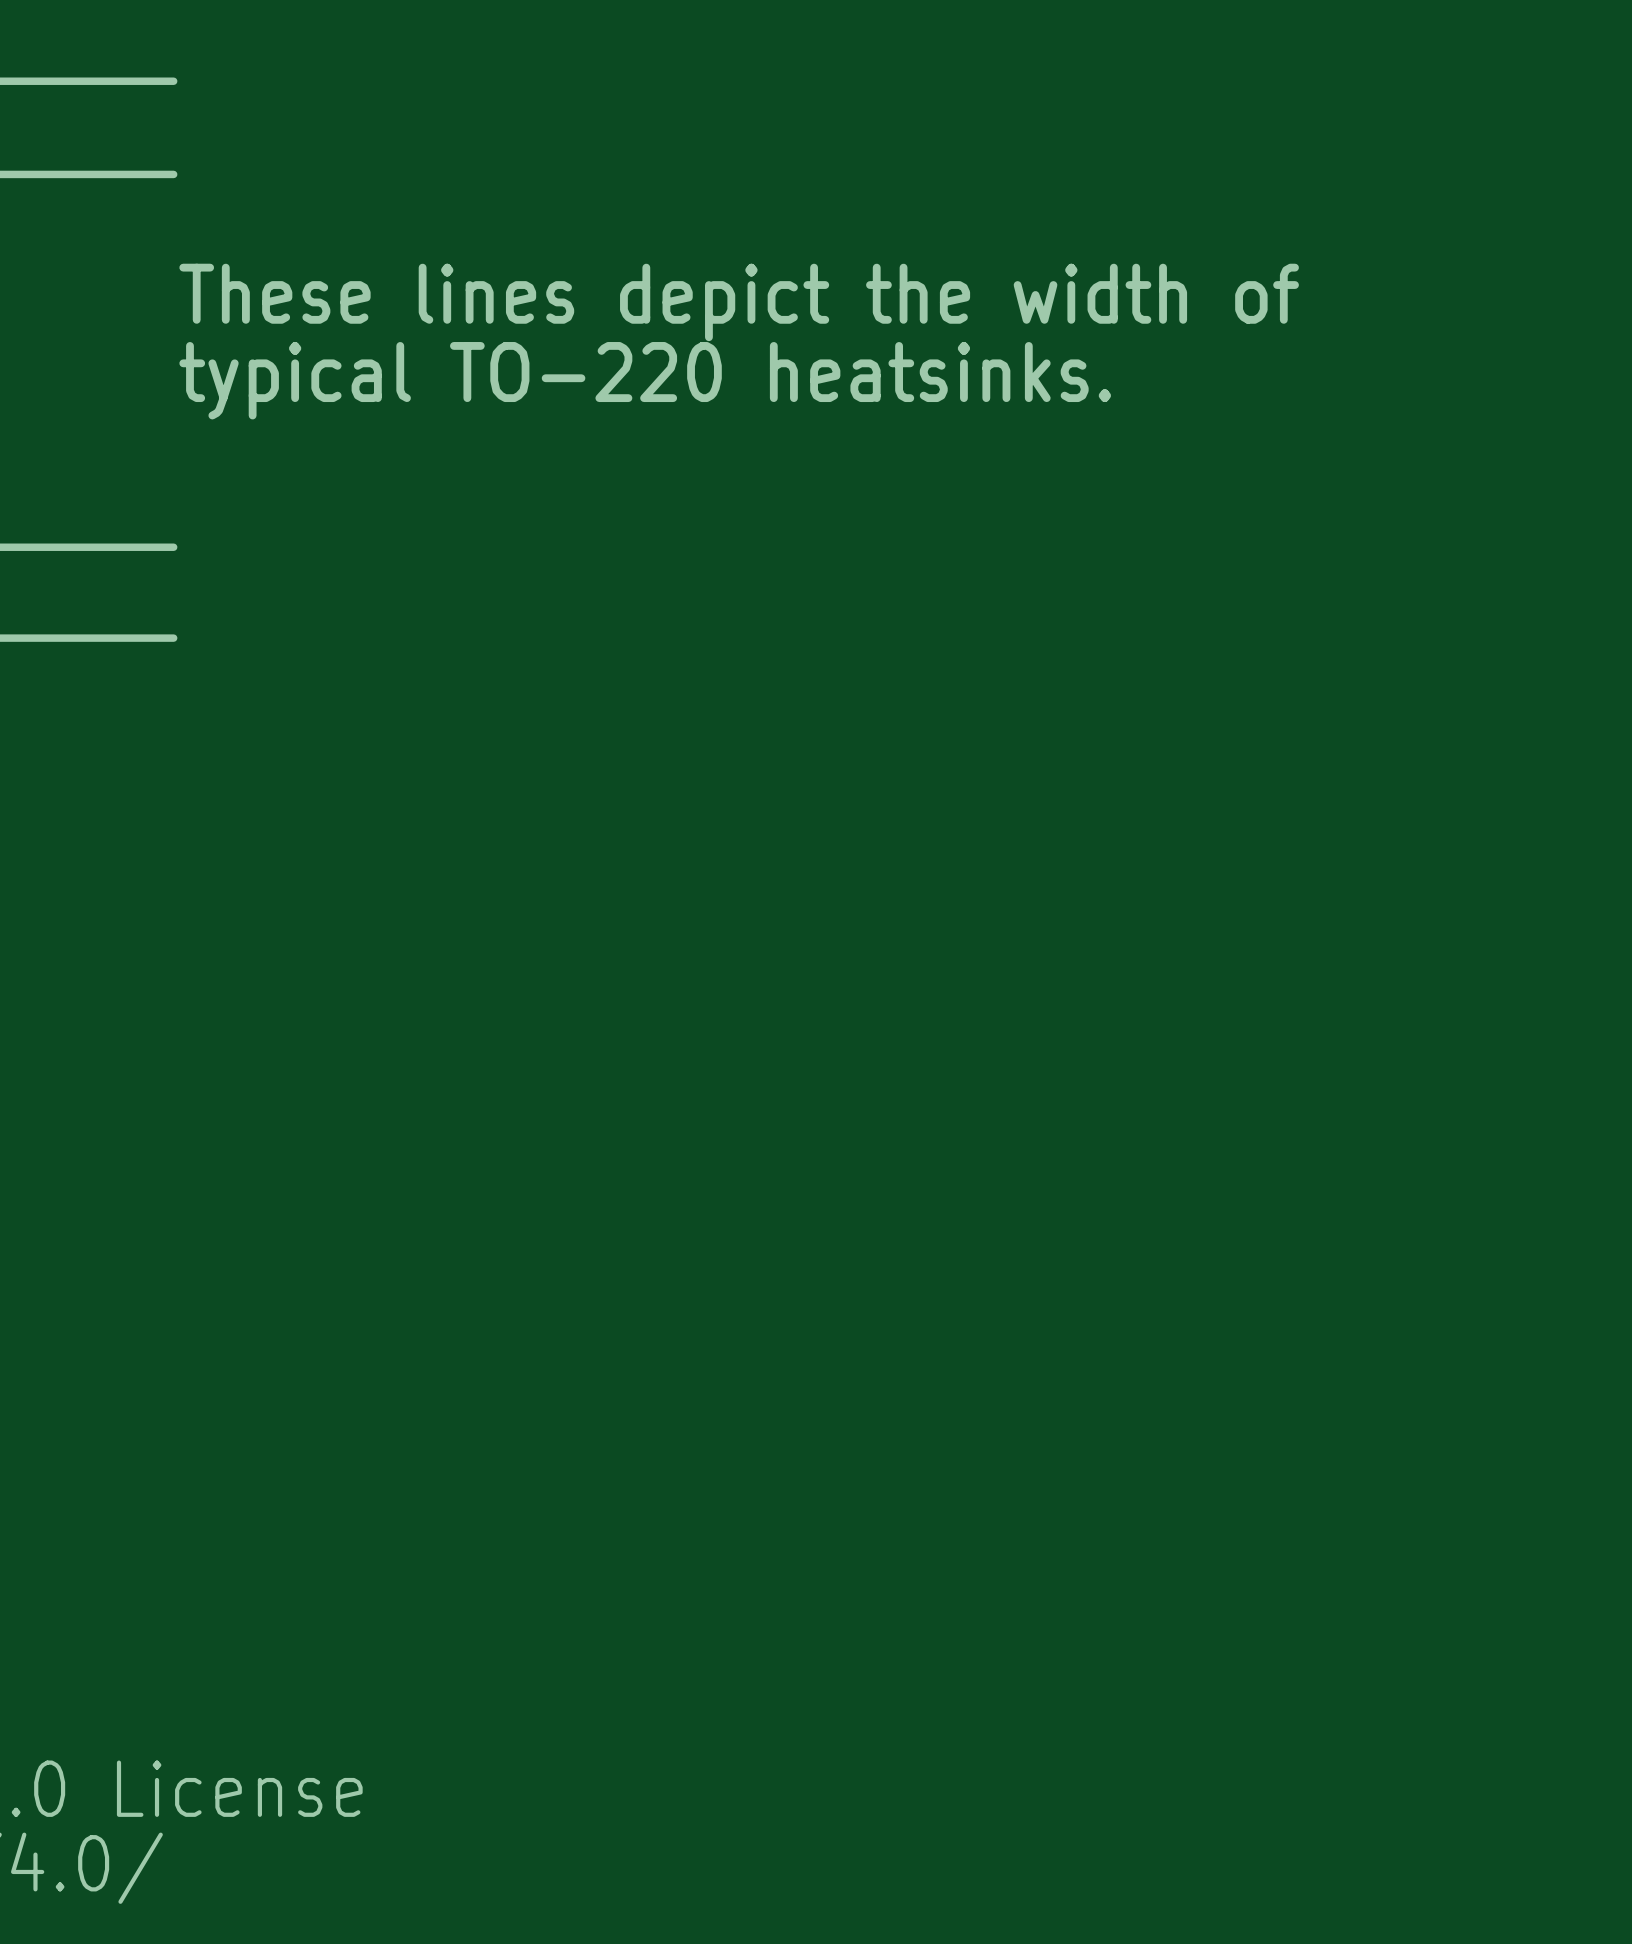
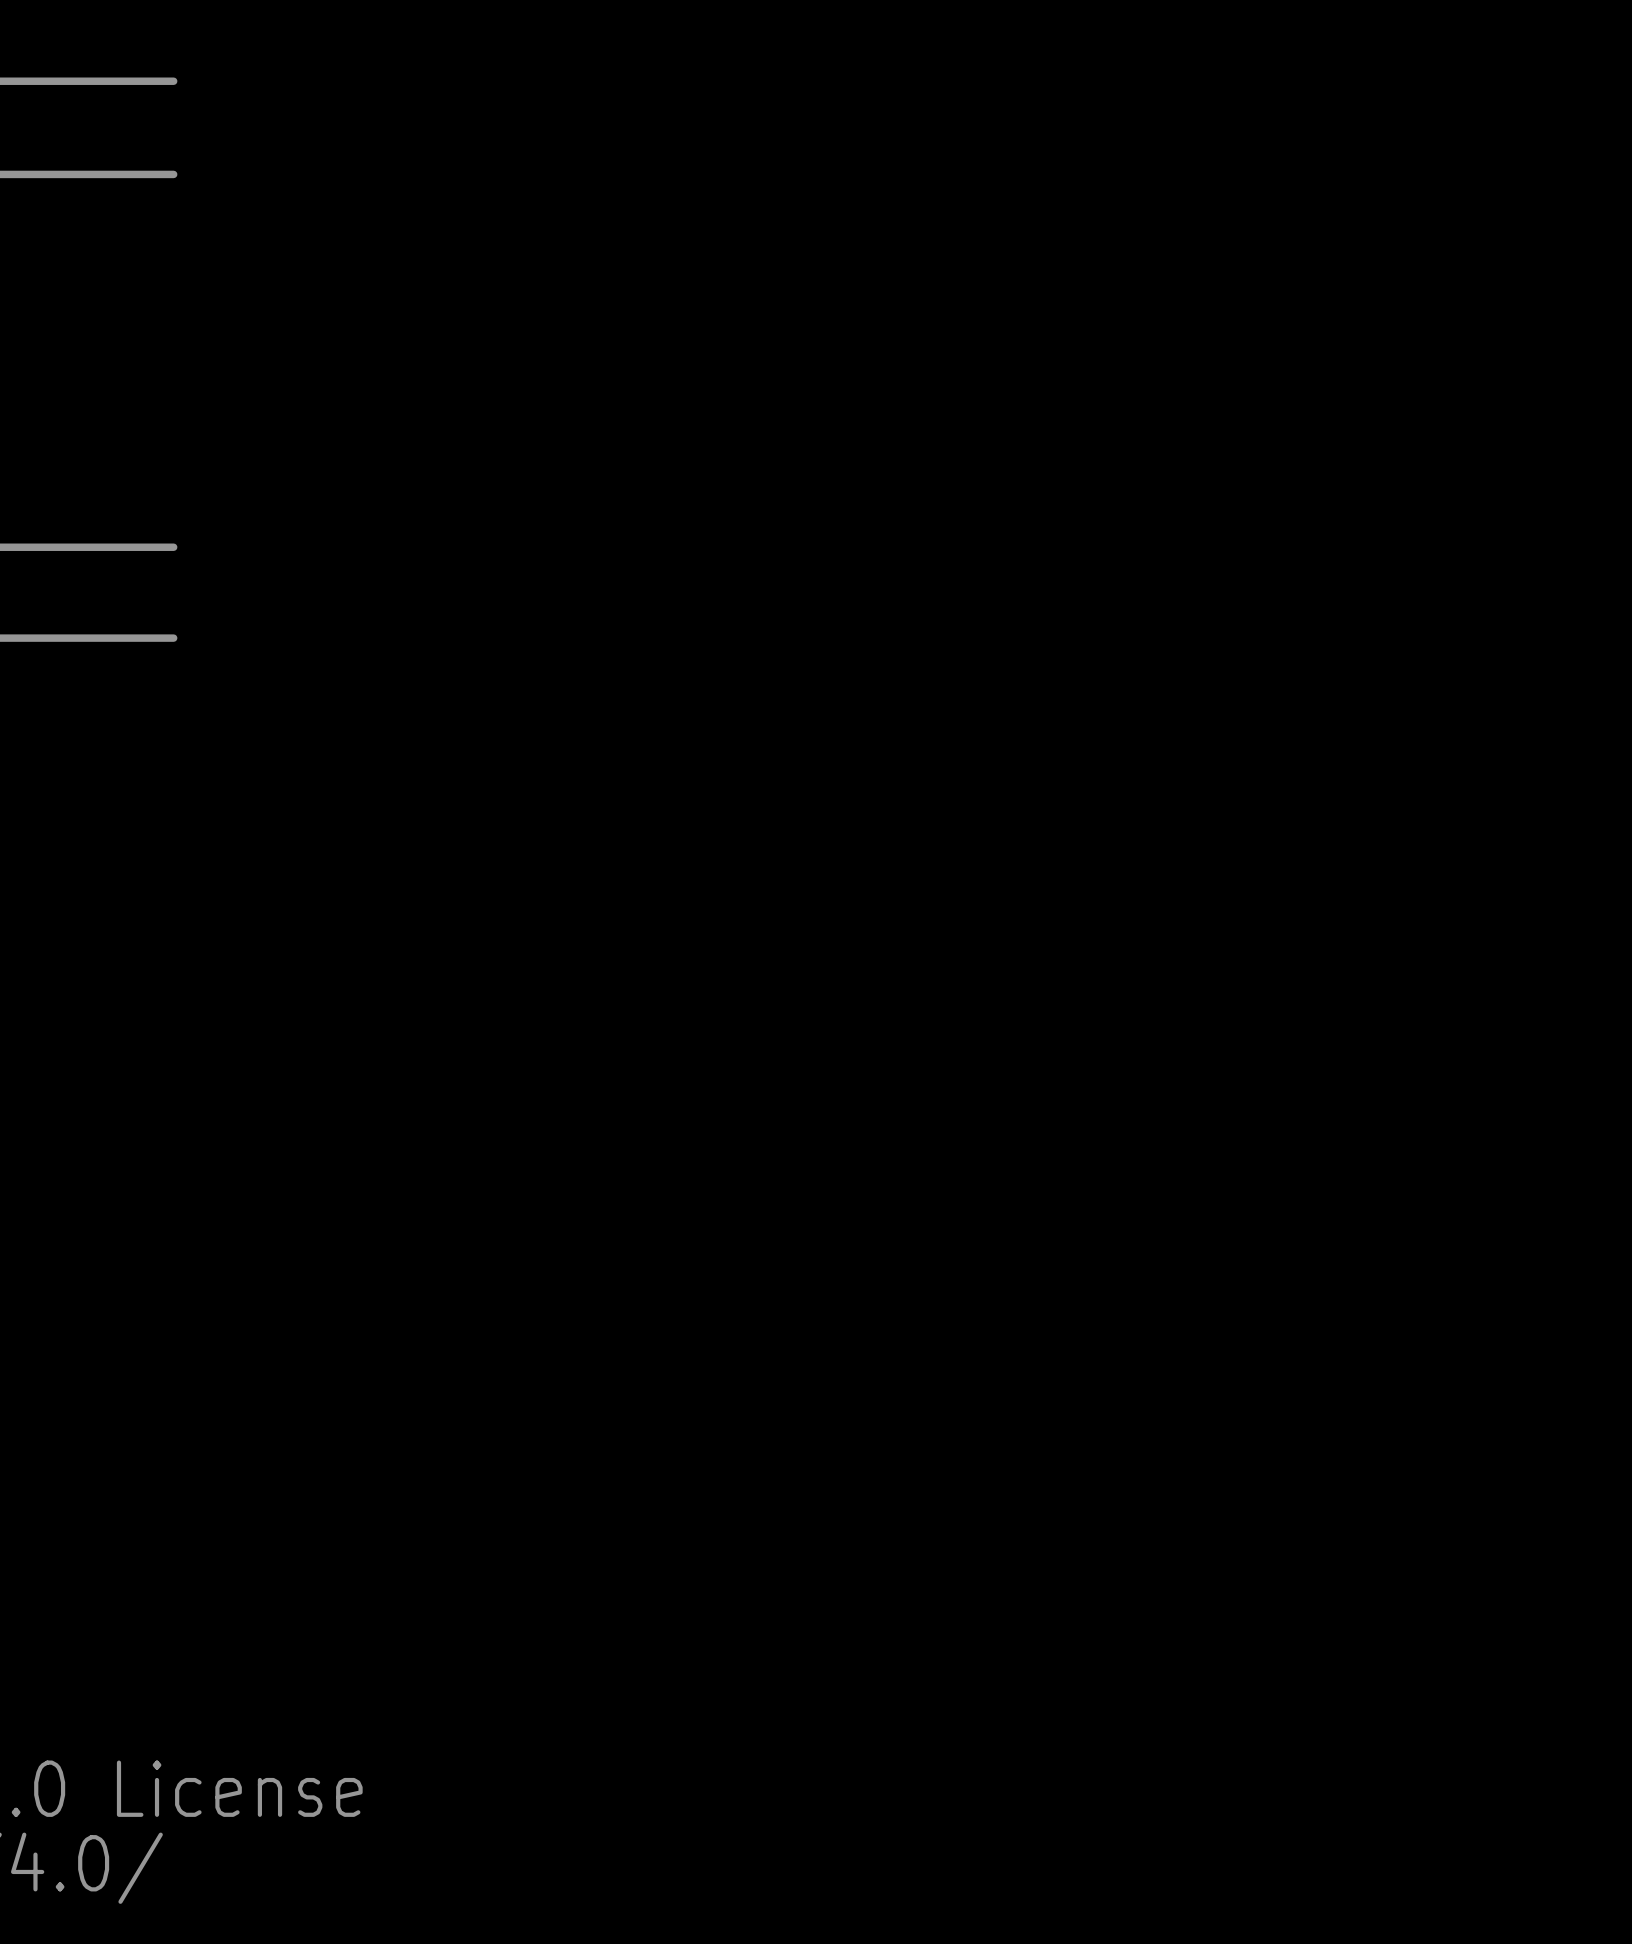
text: These lines depict the width of (739, 302) -> none
text: typical TO-220 heatsinks. (645, 380) -> none

